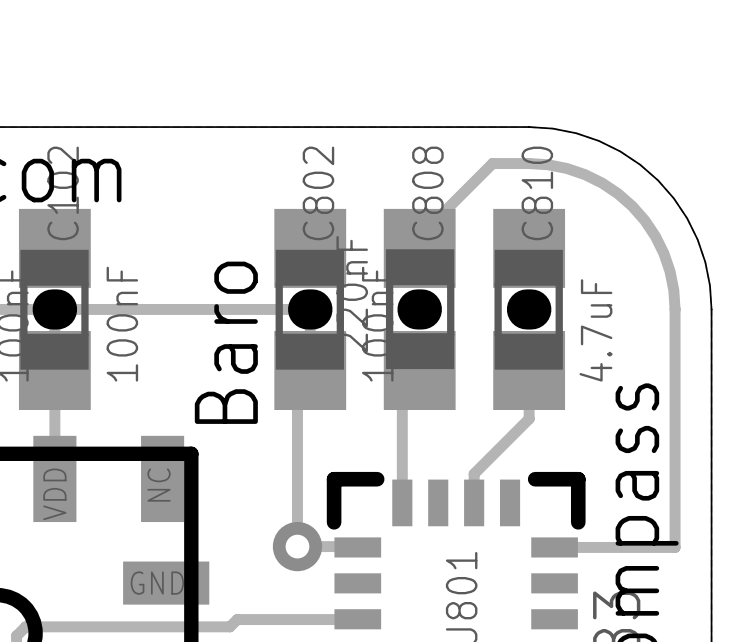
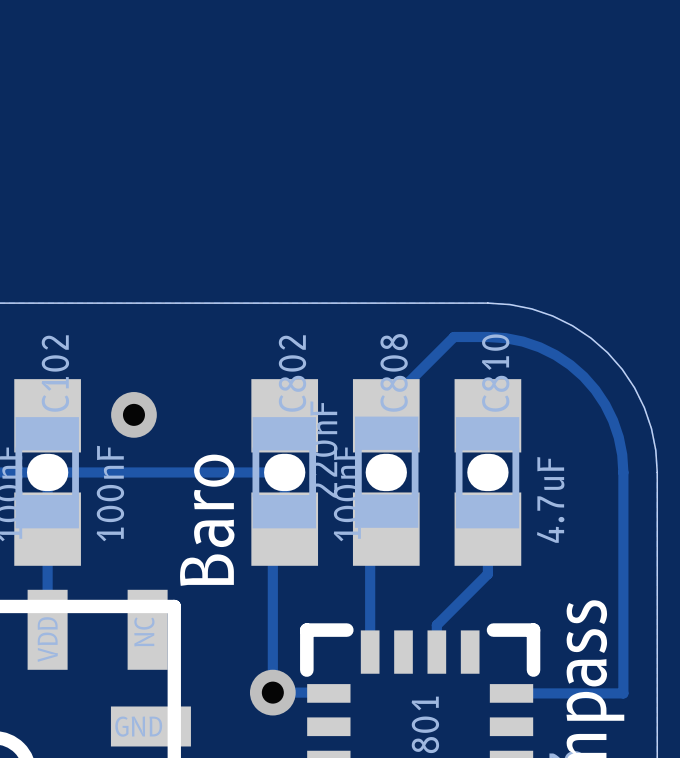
via: none -> (133, 414)

